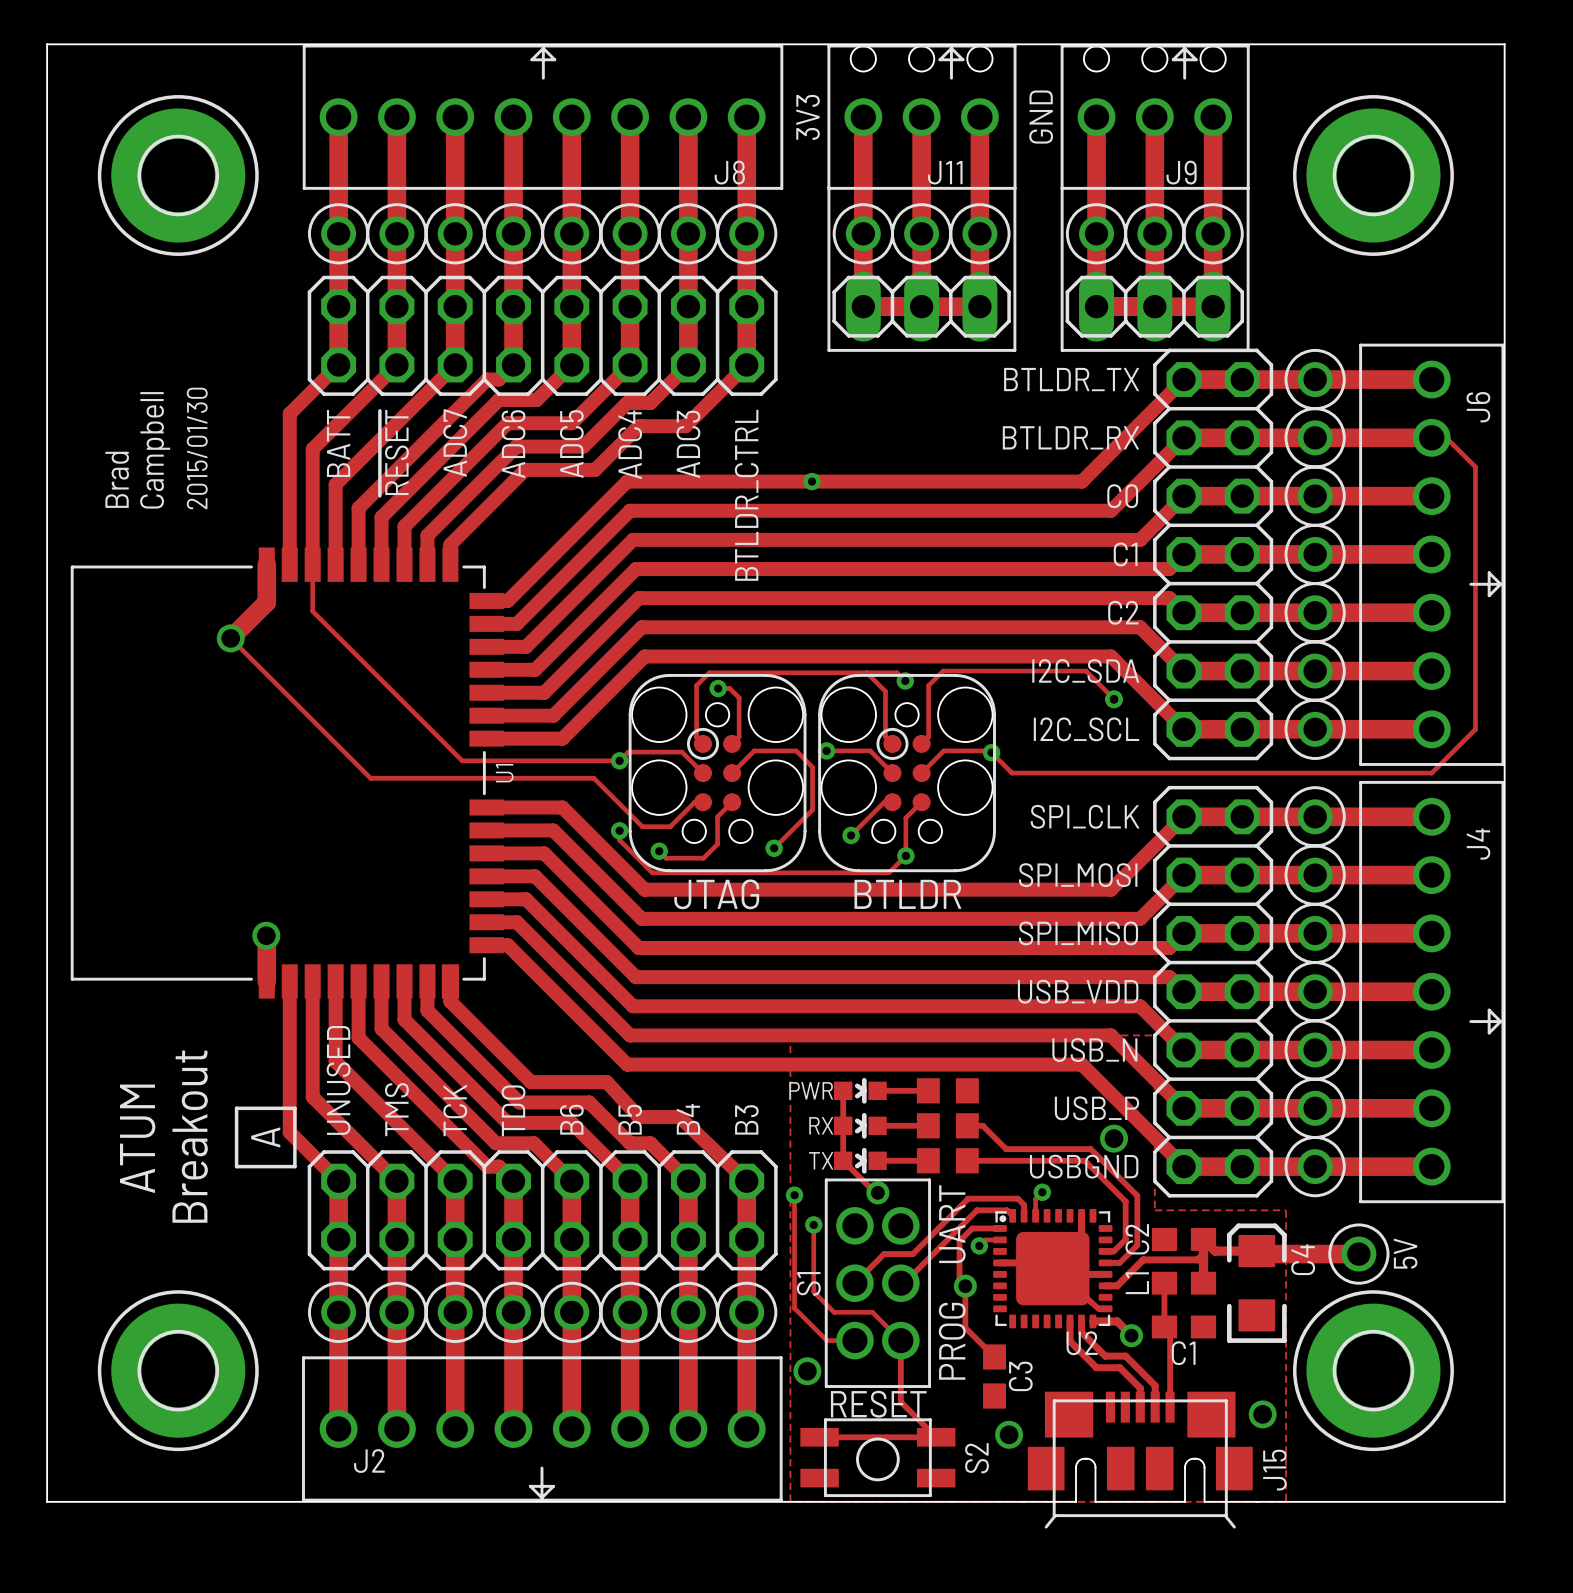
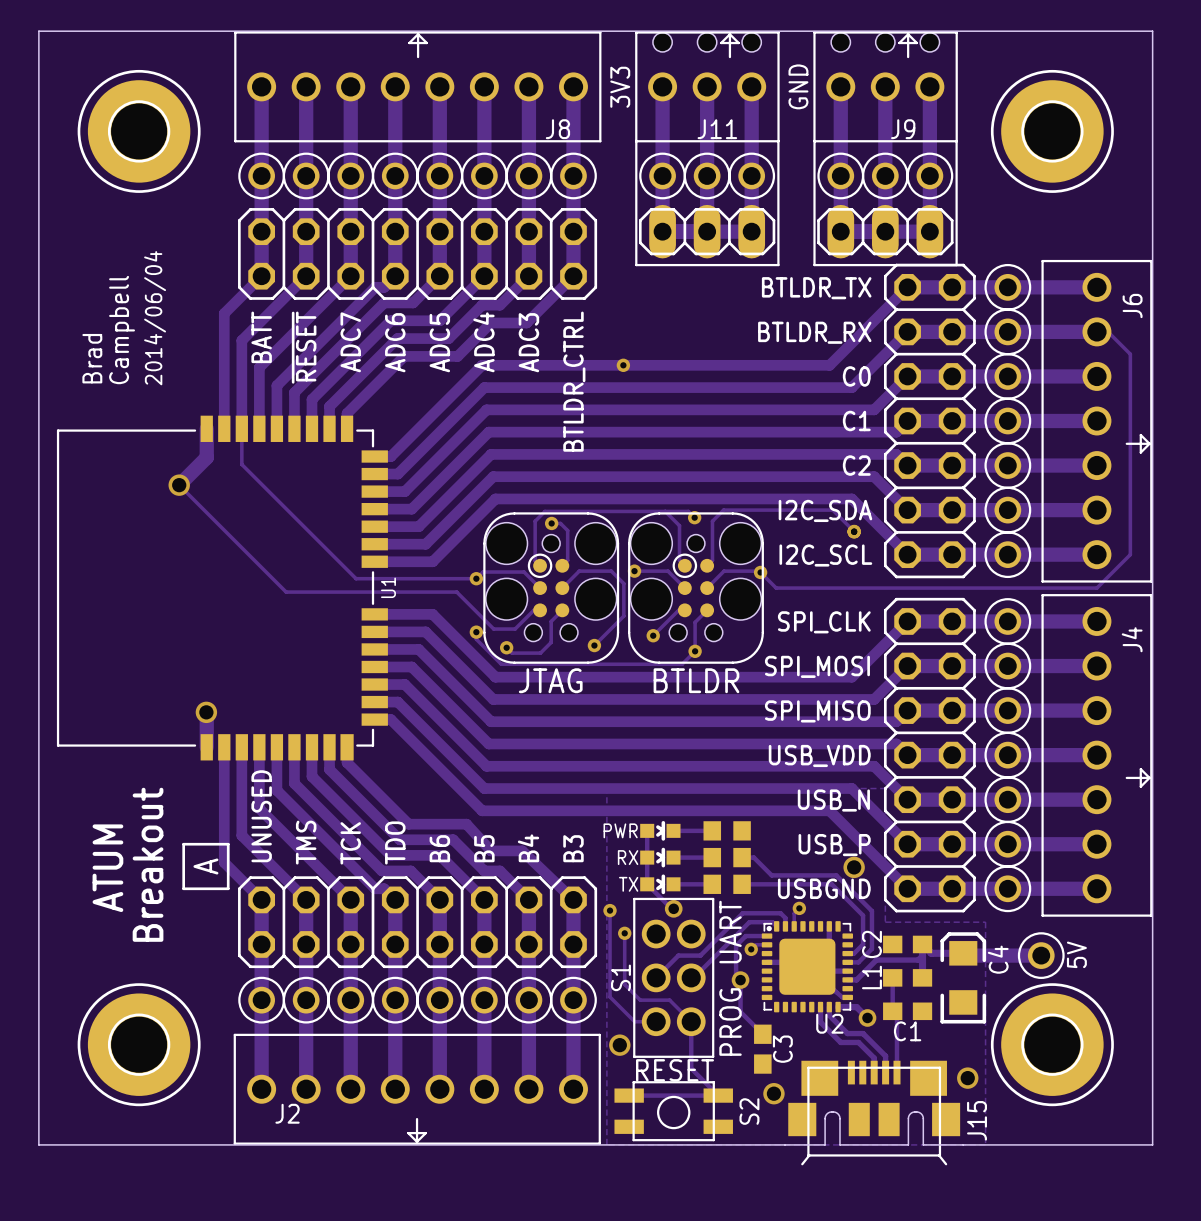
text: 2015/01/30 (197, 448) -> 2014/06/04 (155, 318)

